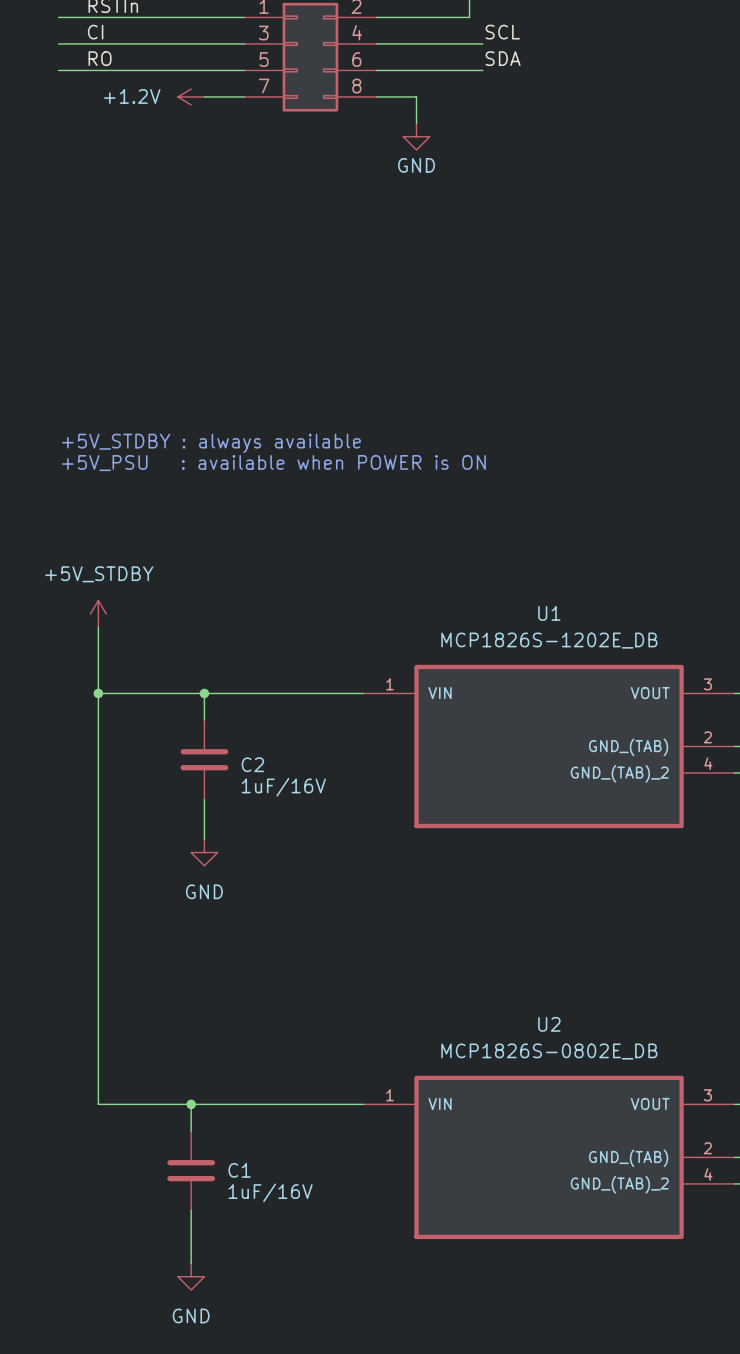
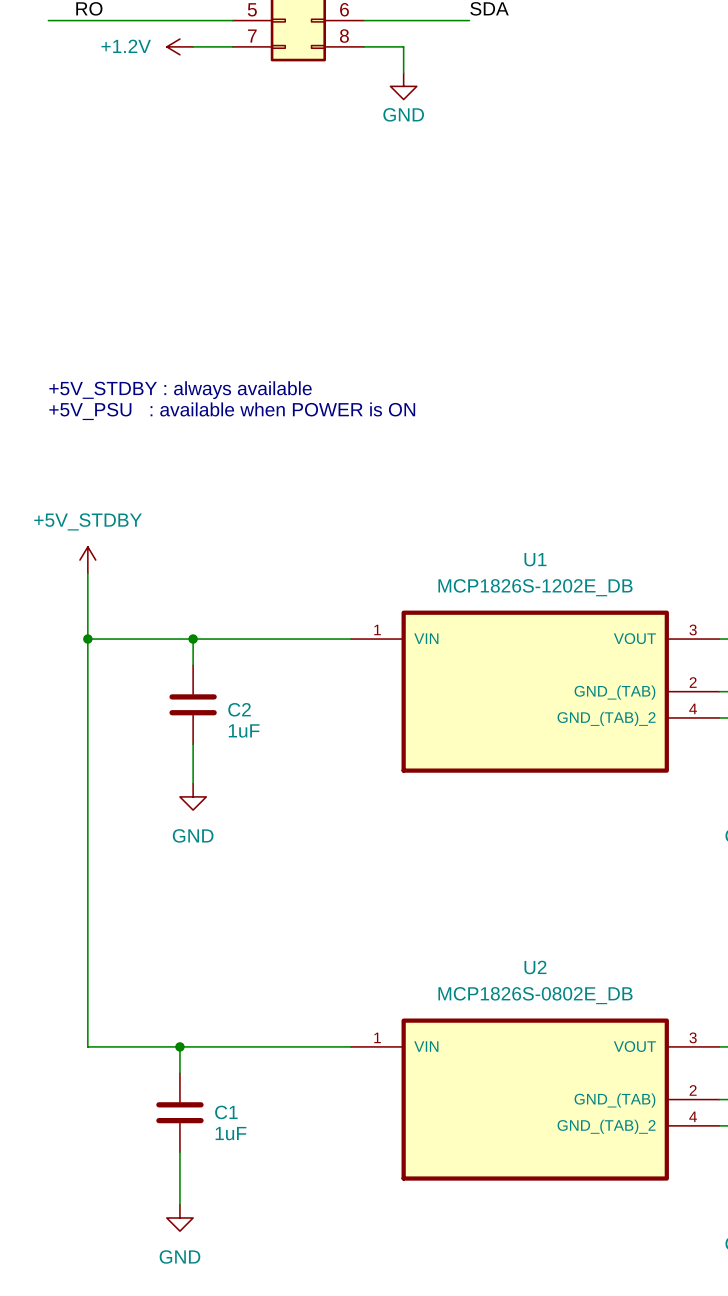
C2 value: 1uF/16V (283, 787) -> 1uF (244, 730)
C1 value: 1uF/16V (270, 1192) -> 1uF (230, 1133)

